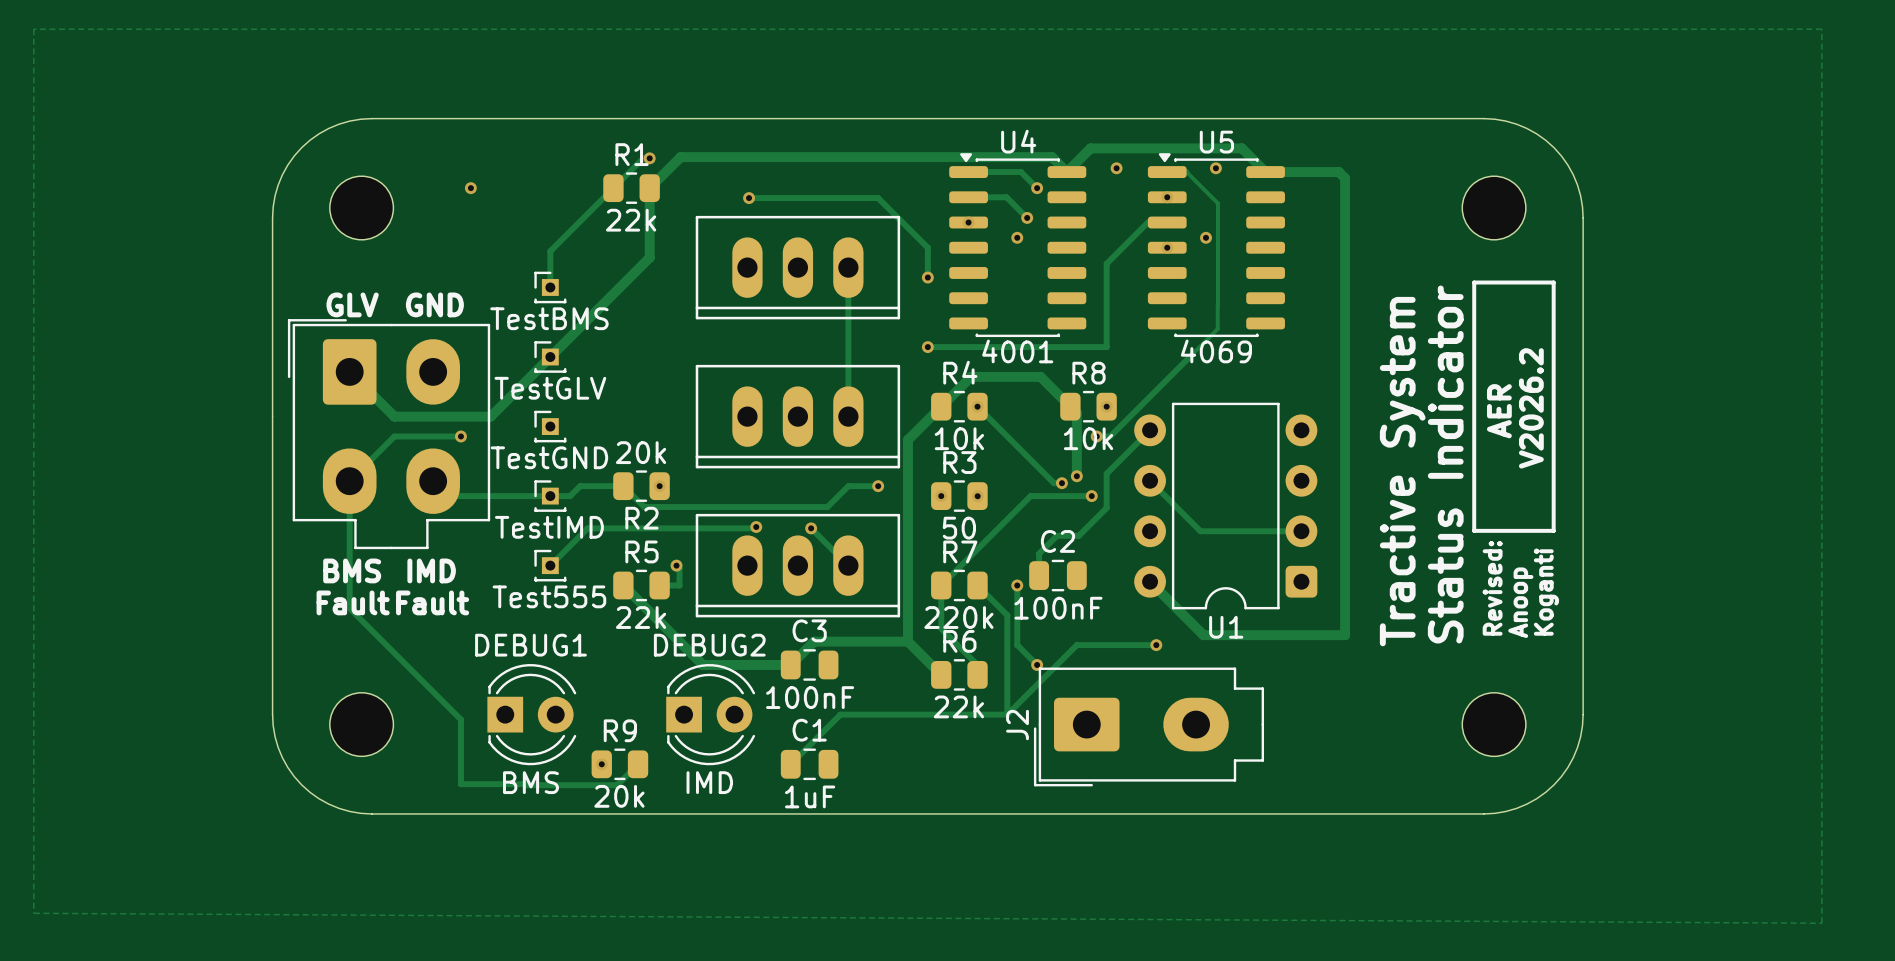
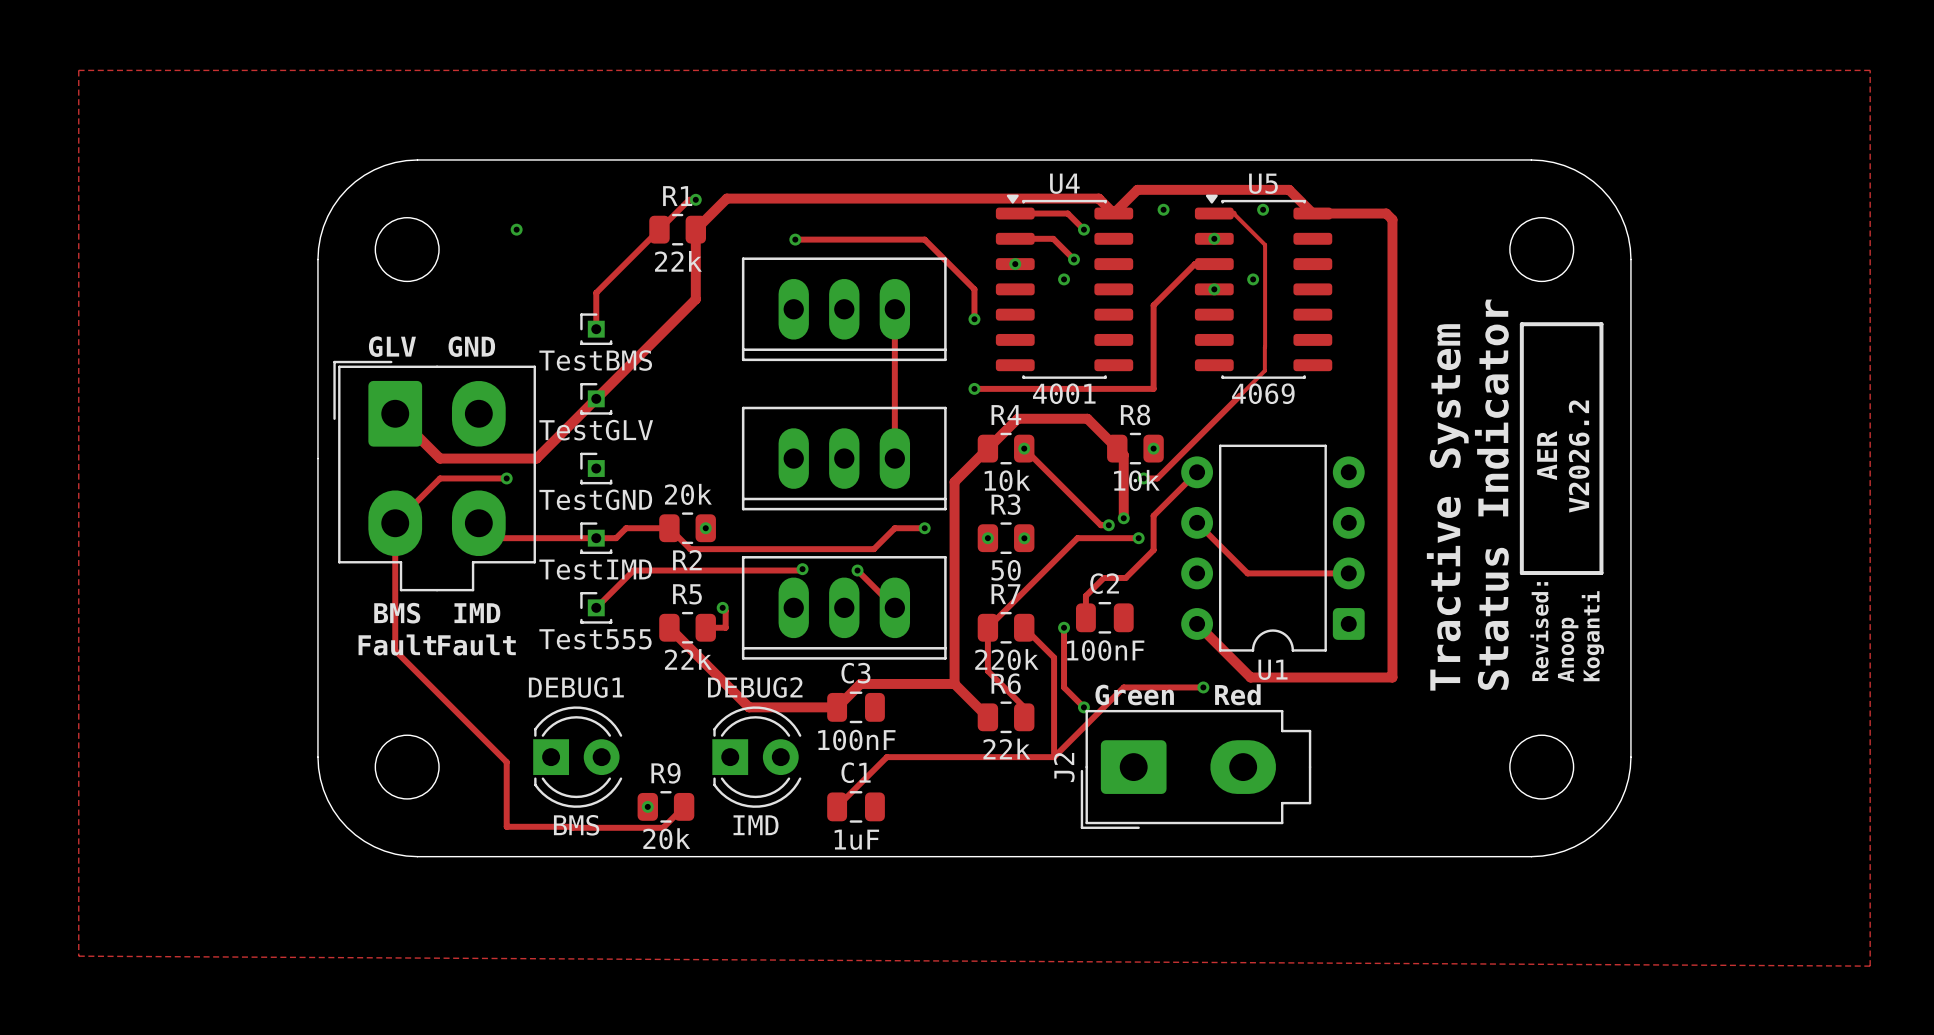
text: none -> Green (1134, 694)
text: none -> Red (1237, 694)

